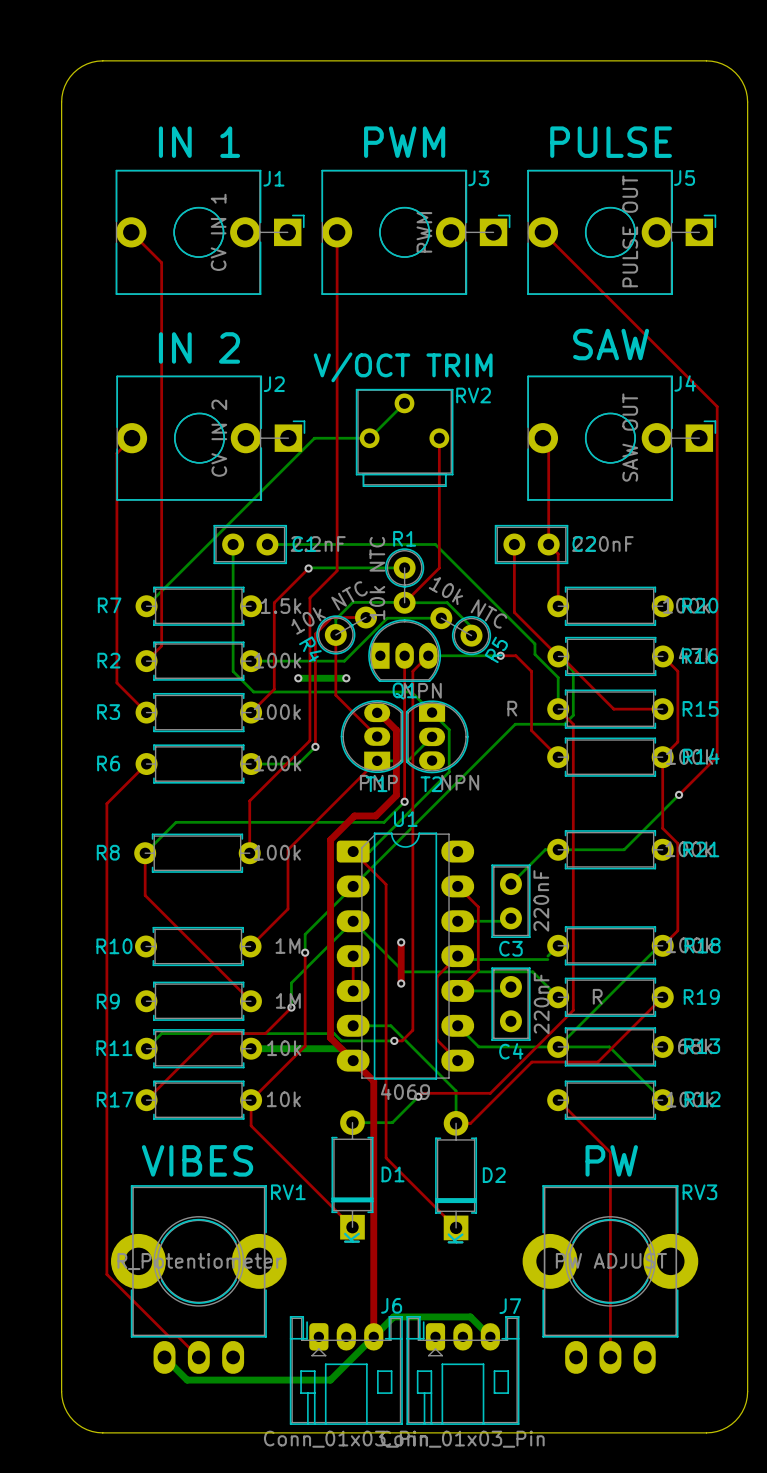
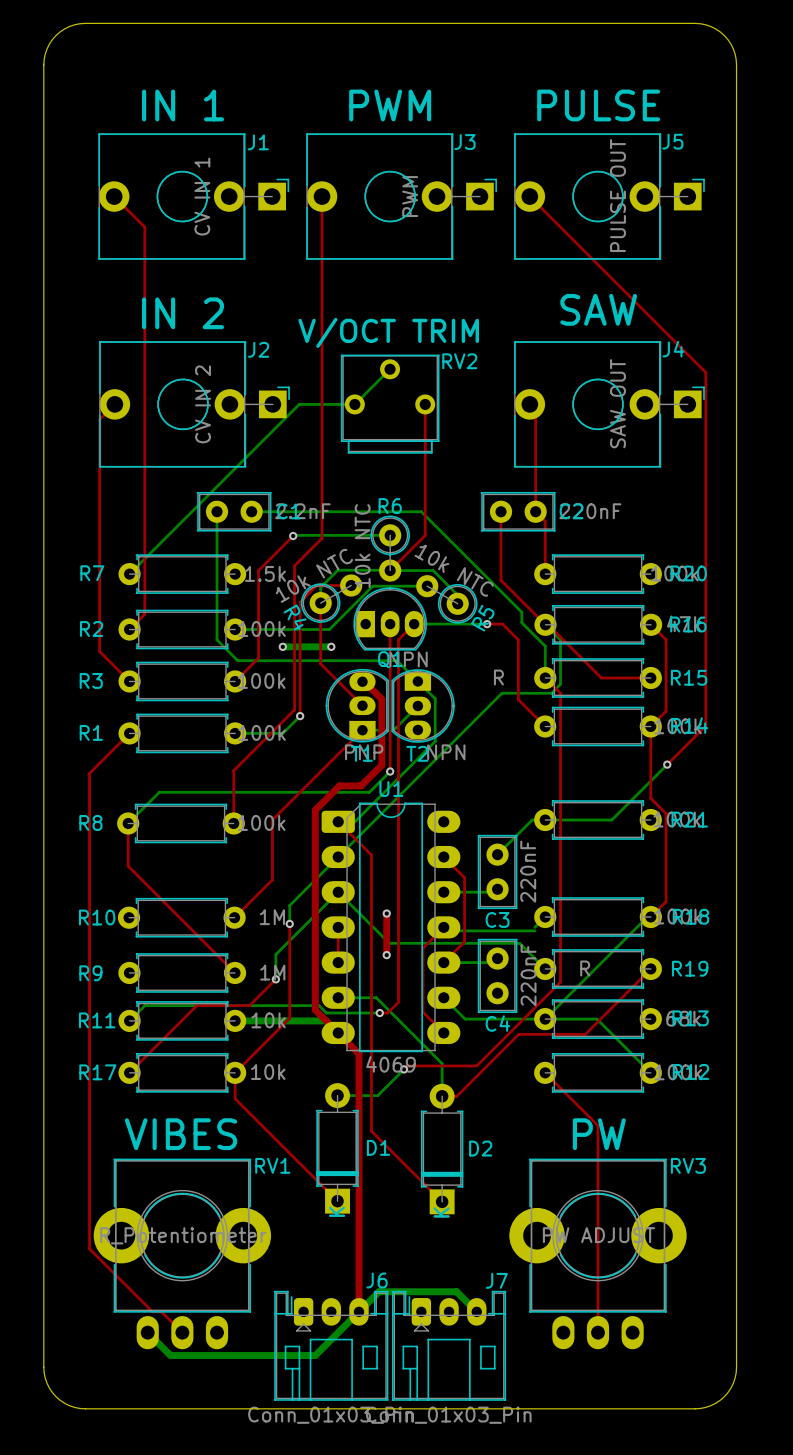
R1 name: R1 (404, 538) -> R6 (390, 506)
R6 name: R6 (108, 763) -> R1 (91, 732)

